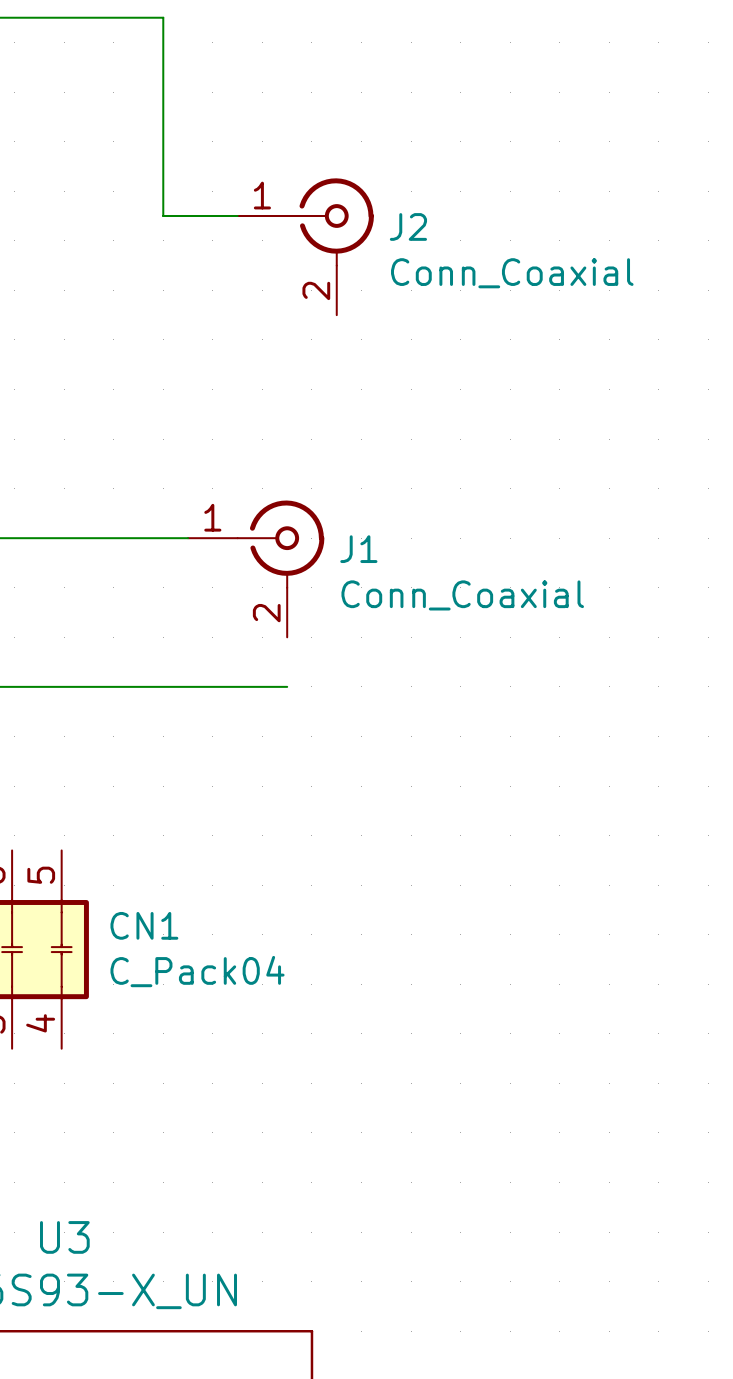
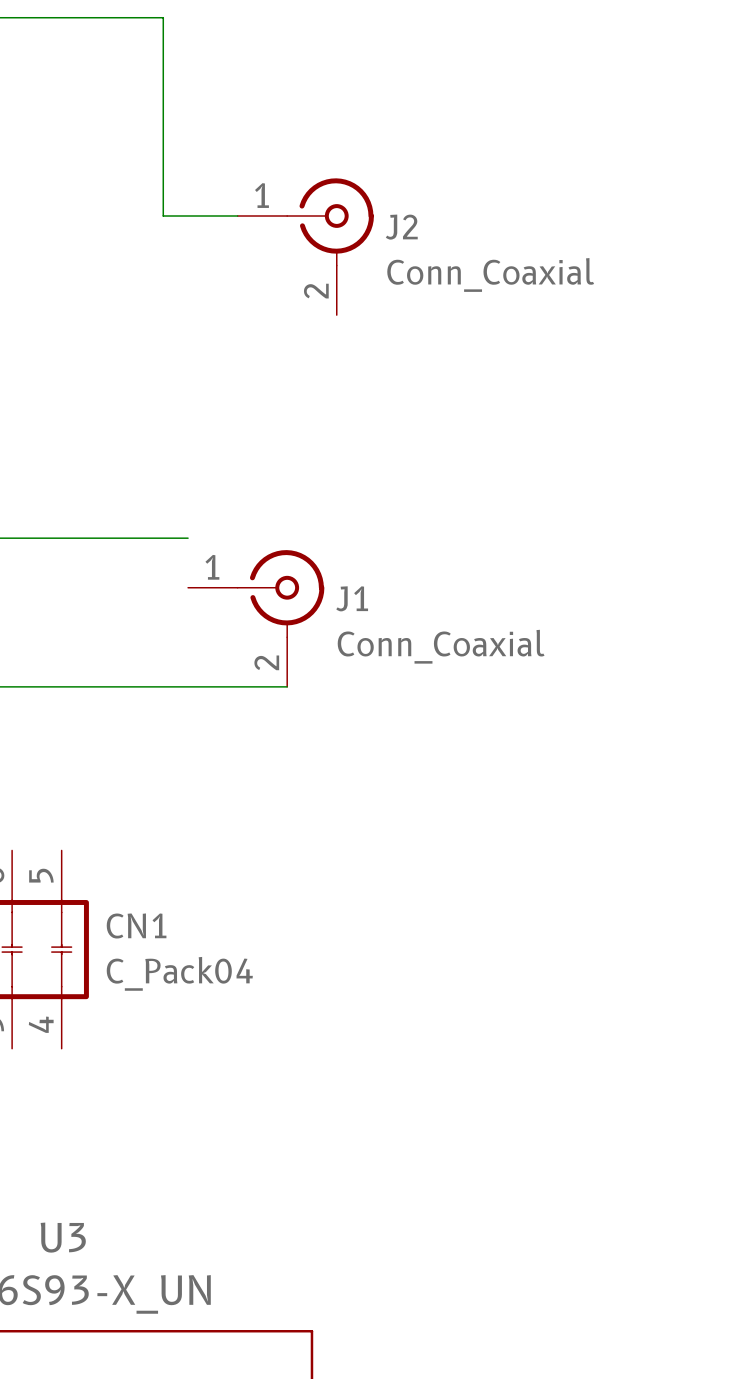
J1 position: (256, 568) -> (256, 618)

